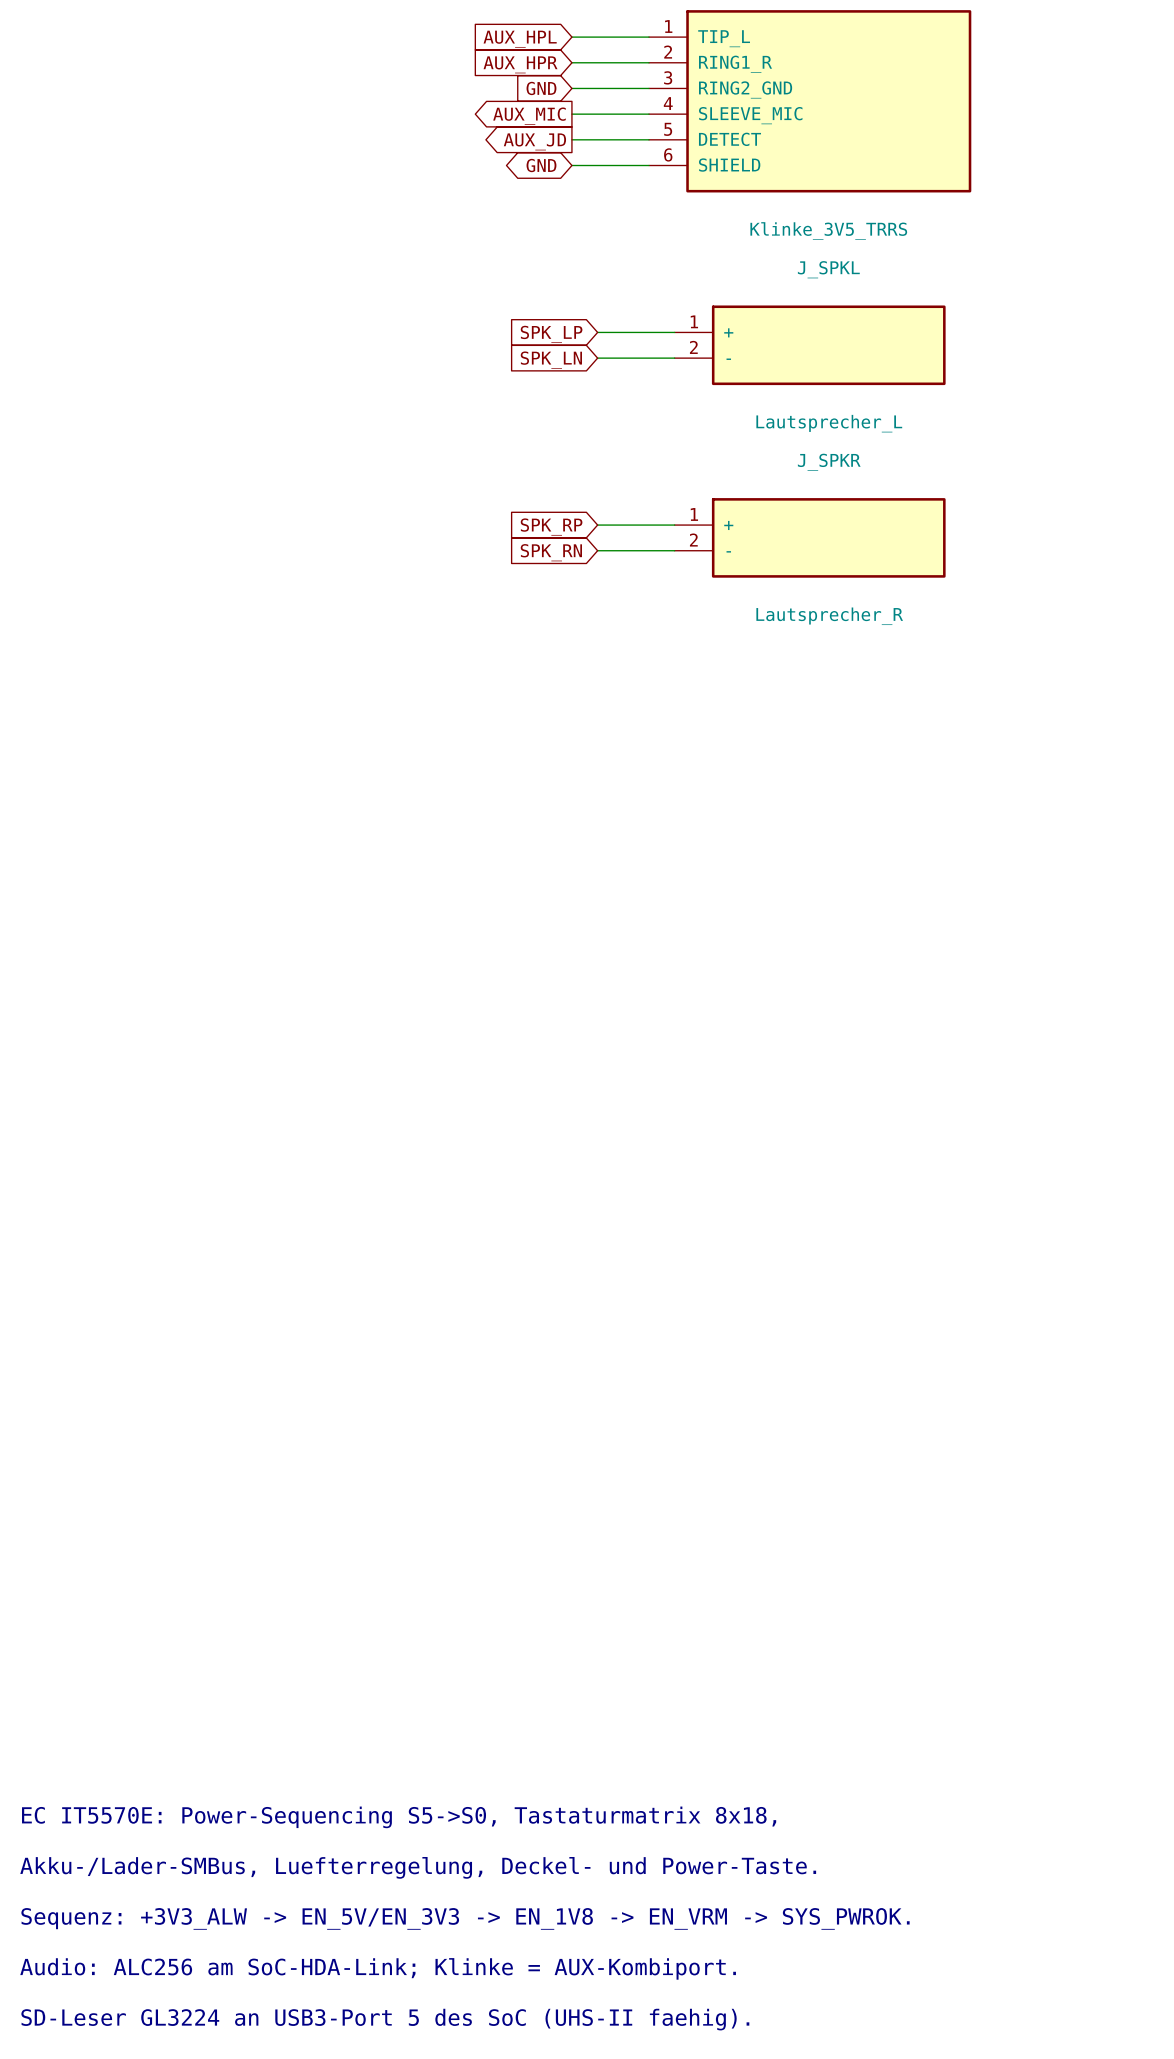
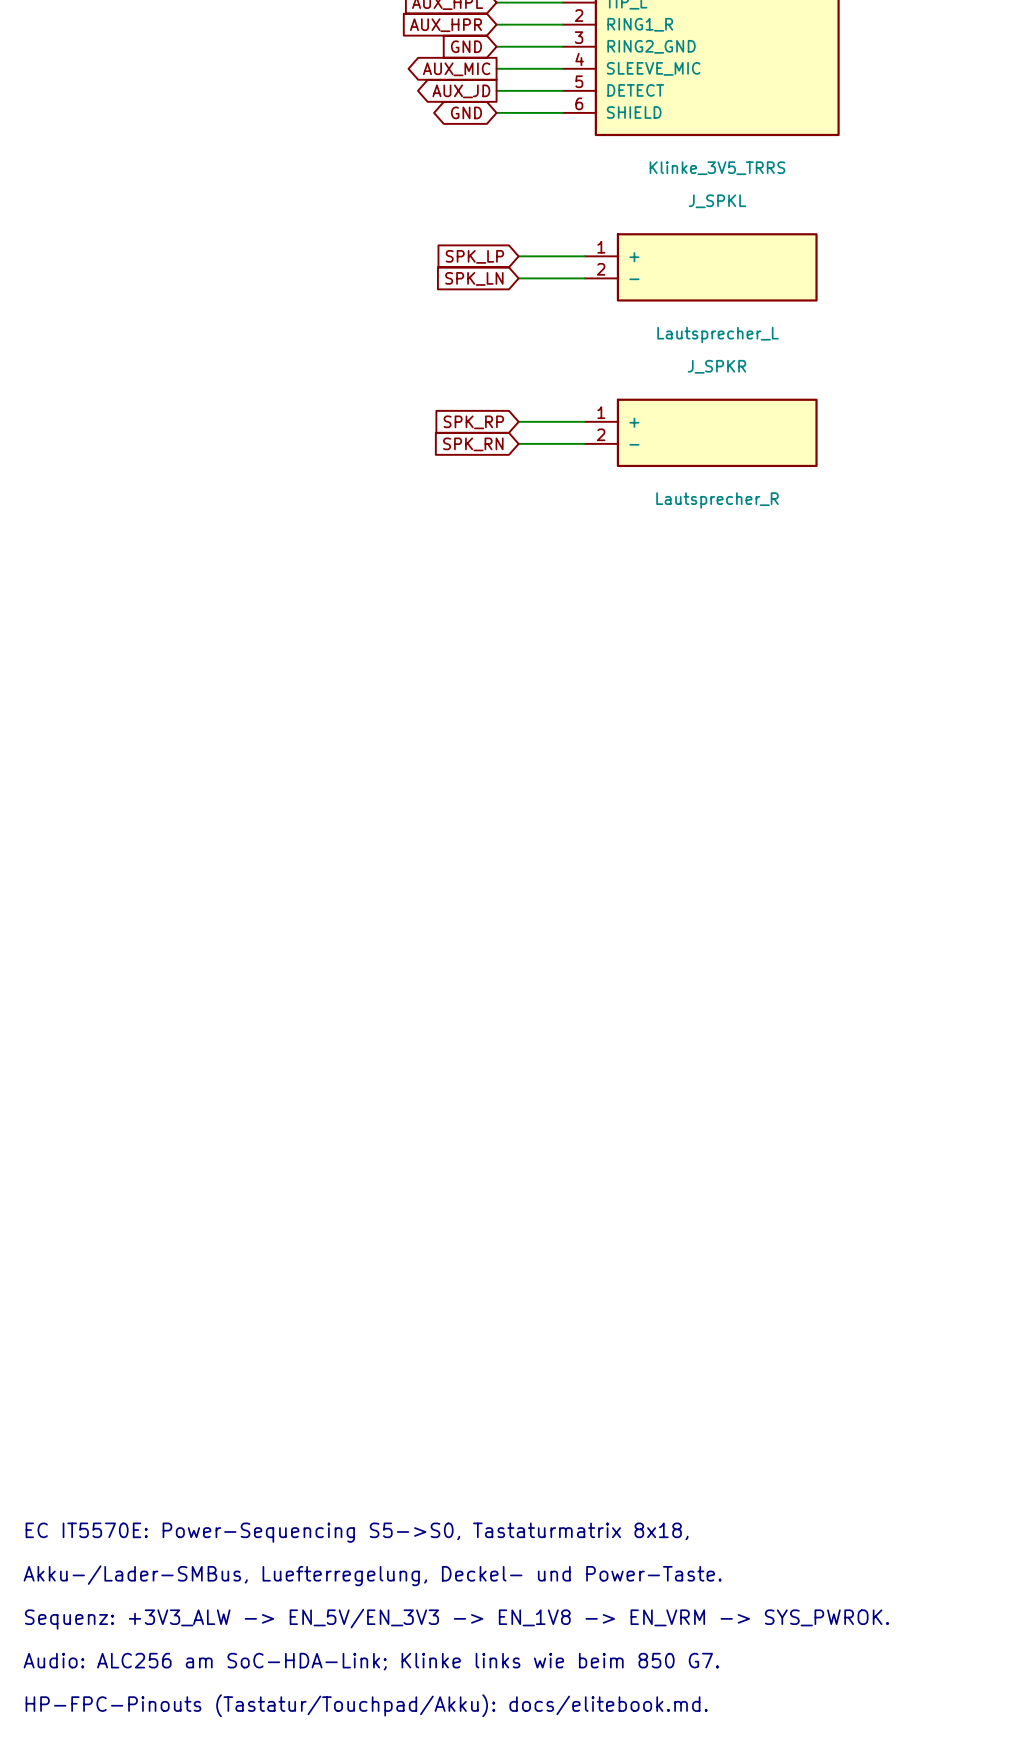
text: Audio: ALC256 am SoC-HDA-Link; Klinke = AUX-Kombiport. (378, 1968) -> Audio: ALC256 am SoC-HDA-Link; Klinke links wie beim 850 G7. (371, 1661)
text: SD-Leser GL3224 an USB3-Port 5 des SoC (UHS-II faehig). (385, 2019) -> HP-FPC-Pinouts (Tastatur/Touchpad/Akku): docs/elitebook.md. (366, 1705)

